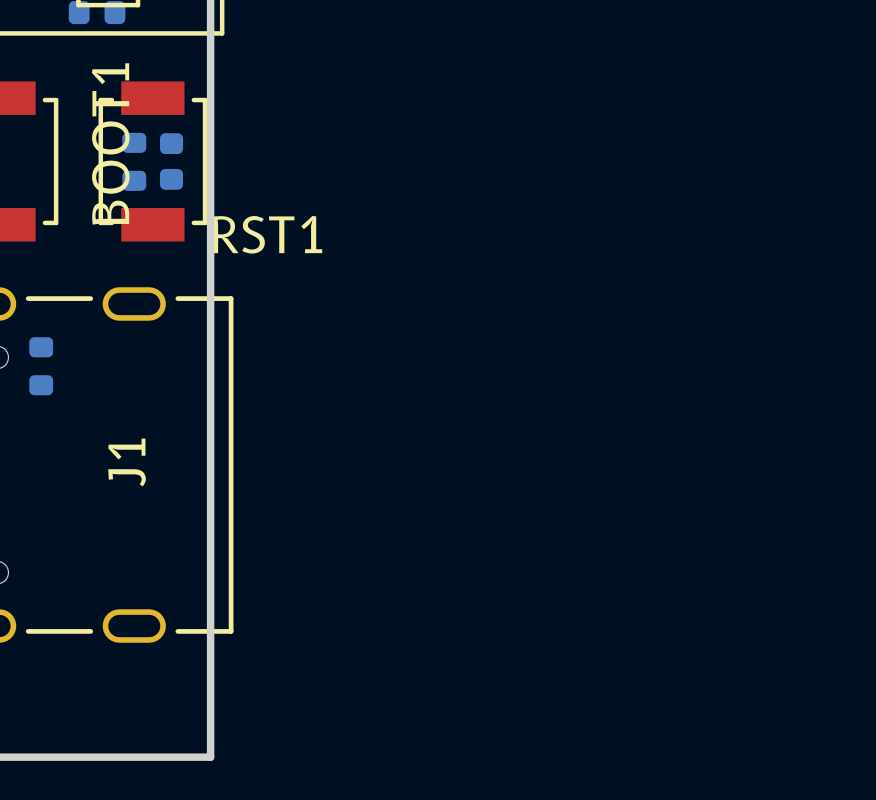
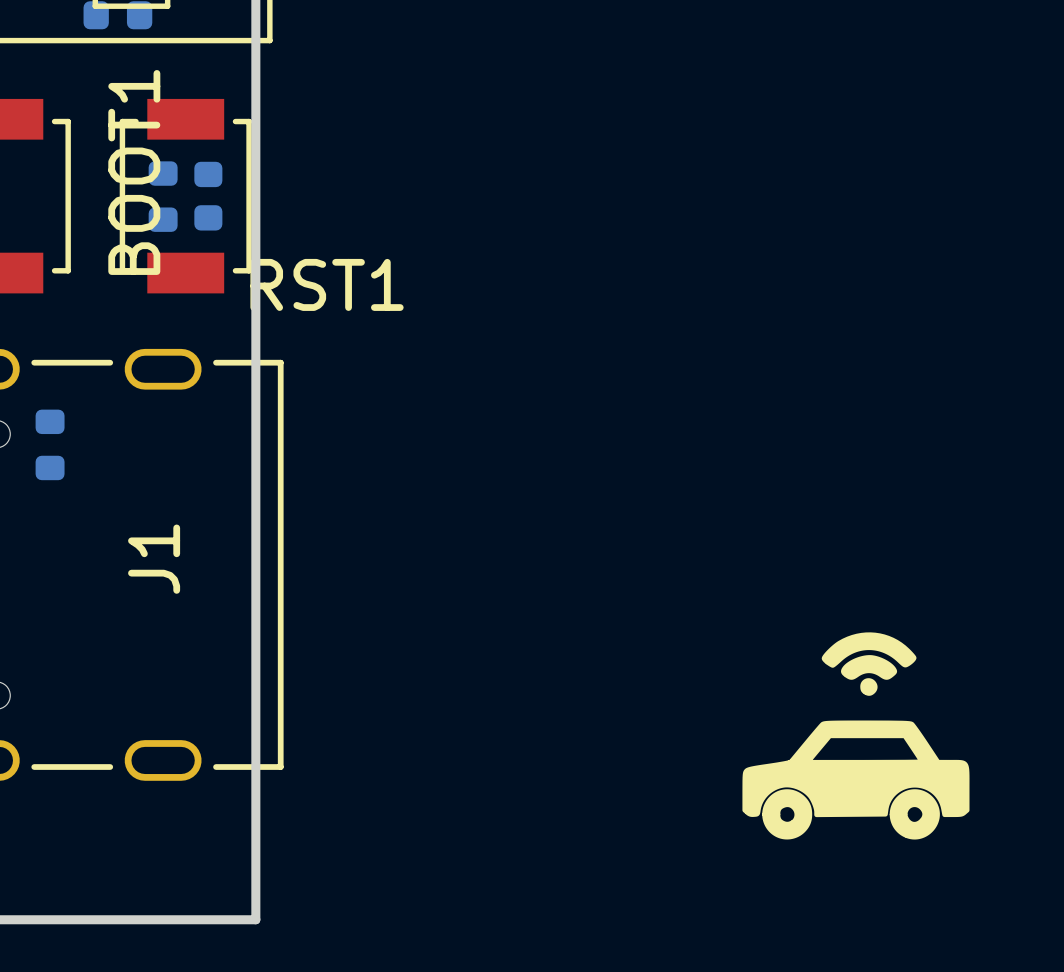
drawing: none -> [742, 632, 970, 840]

